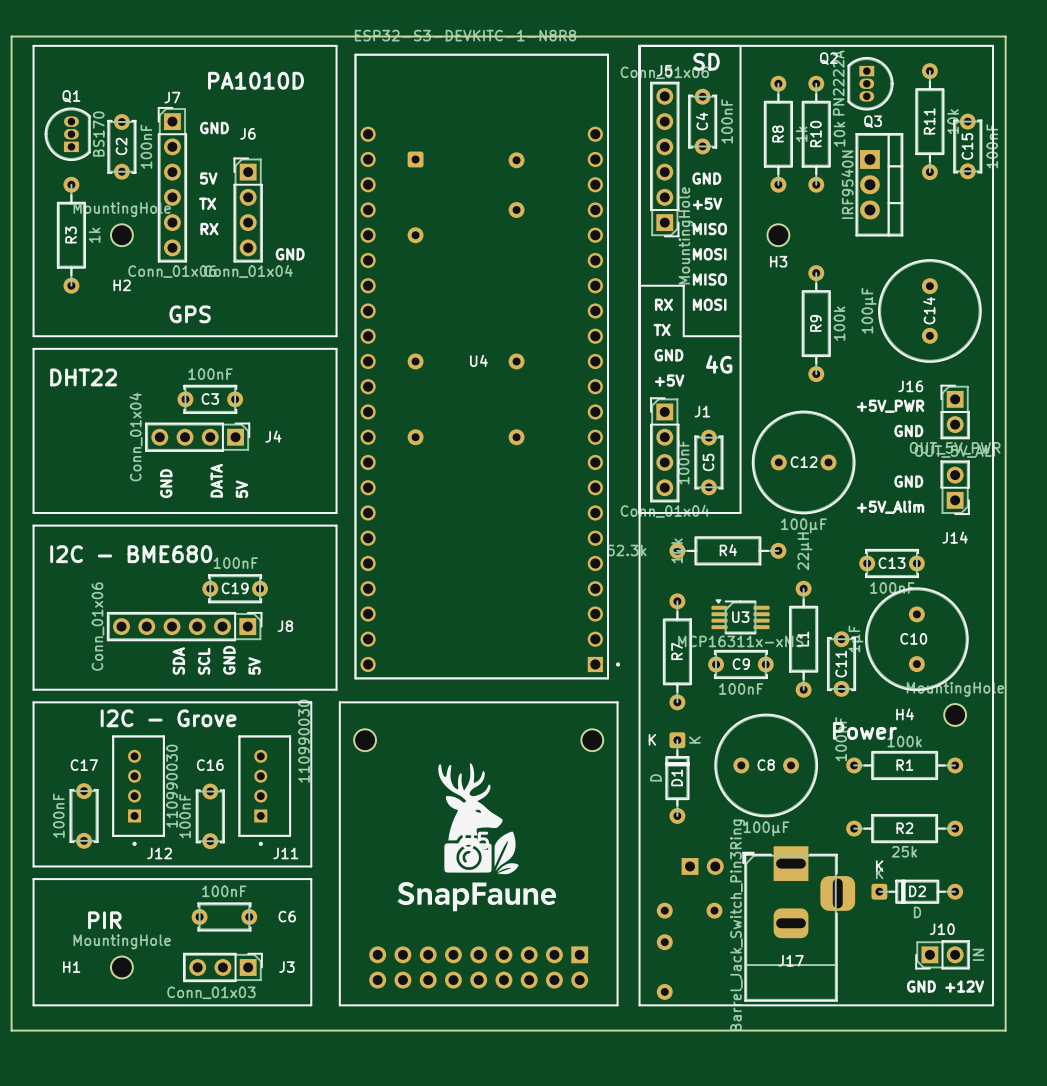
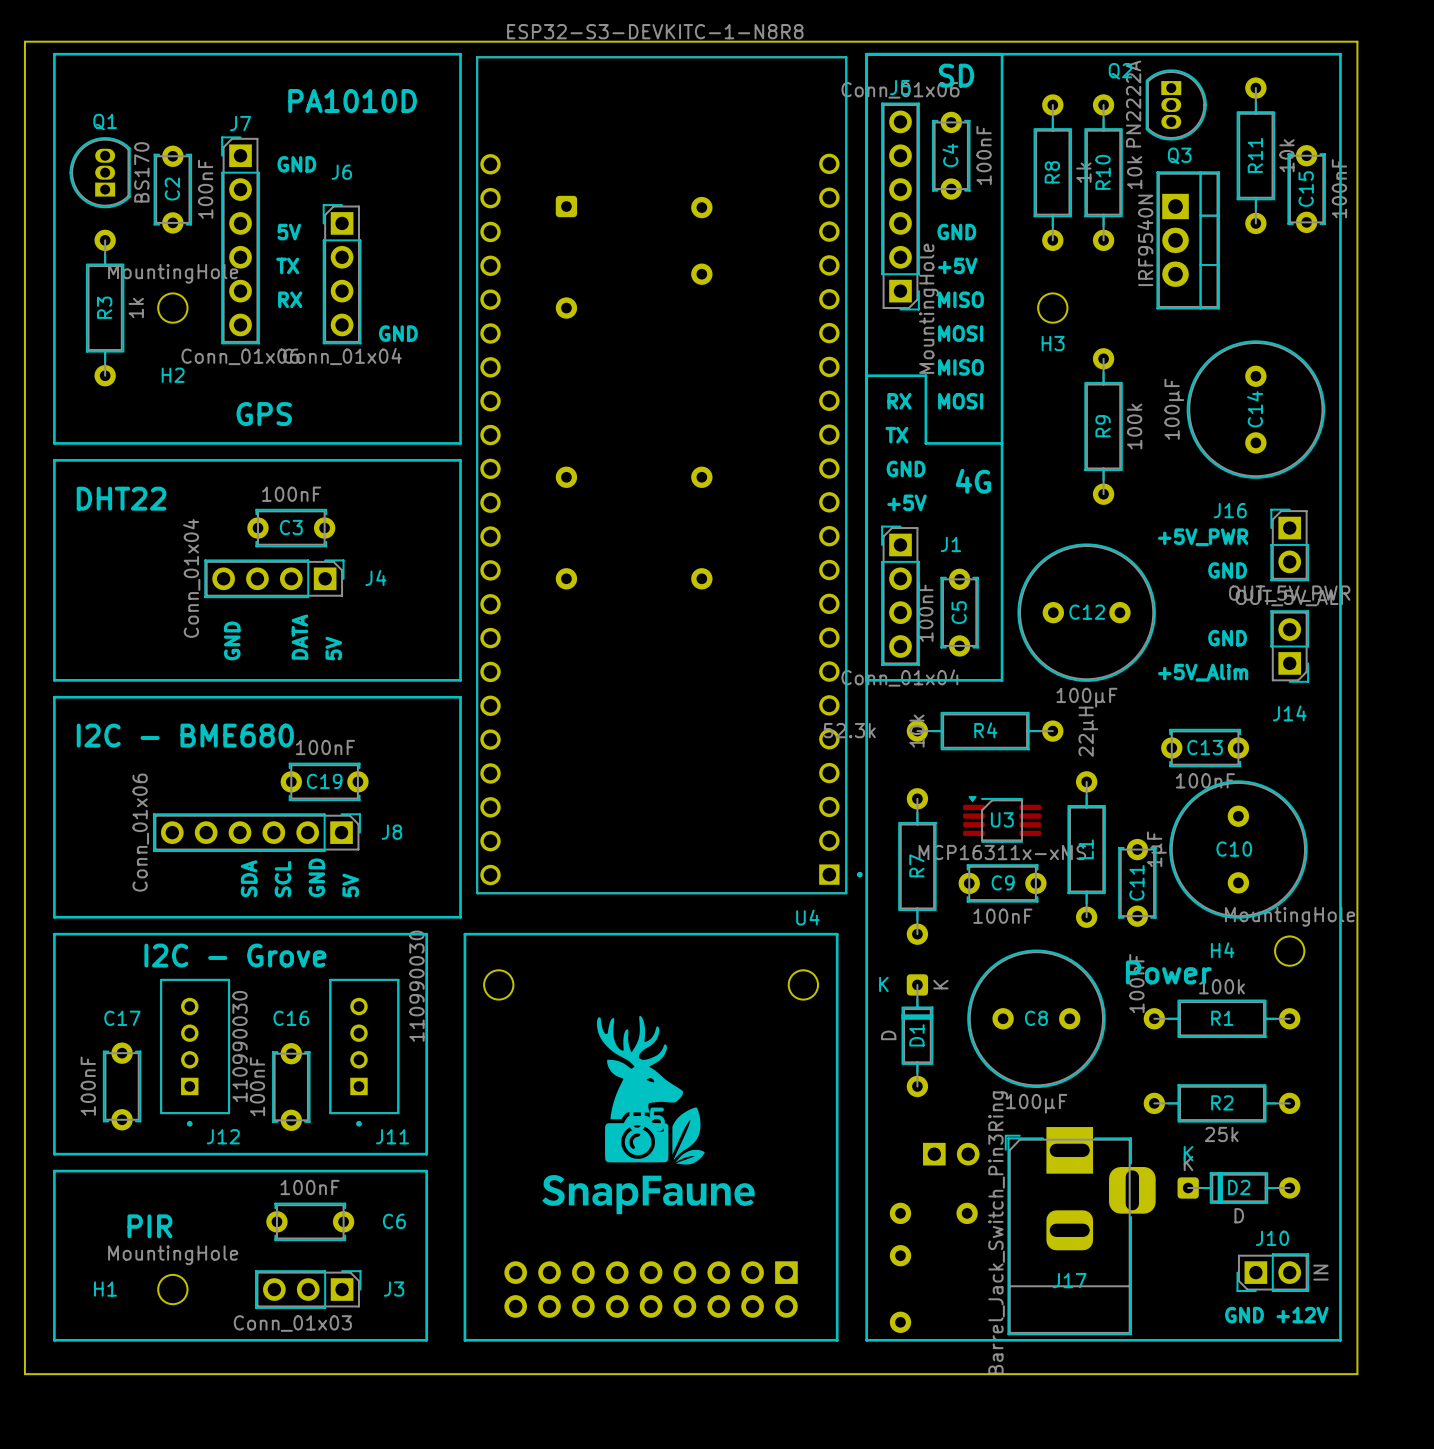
U4 footprint: [354, 54, 621, 680] -> [476, 56, 863, 895]
U4 name position: U4 (478, 360) -> U4 (807, 917)

